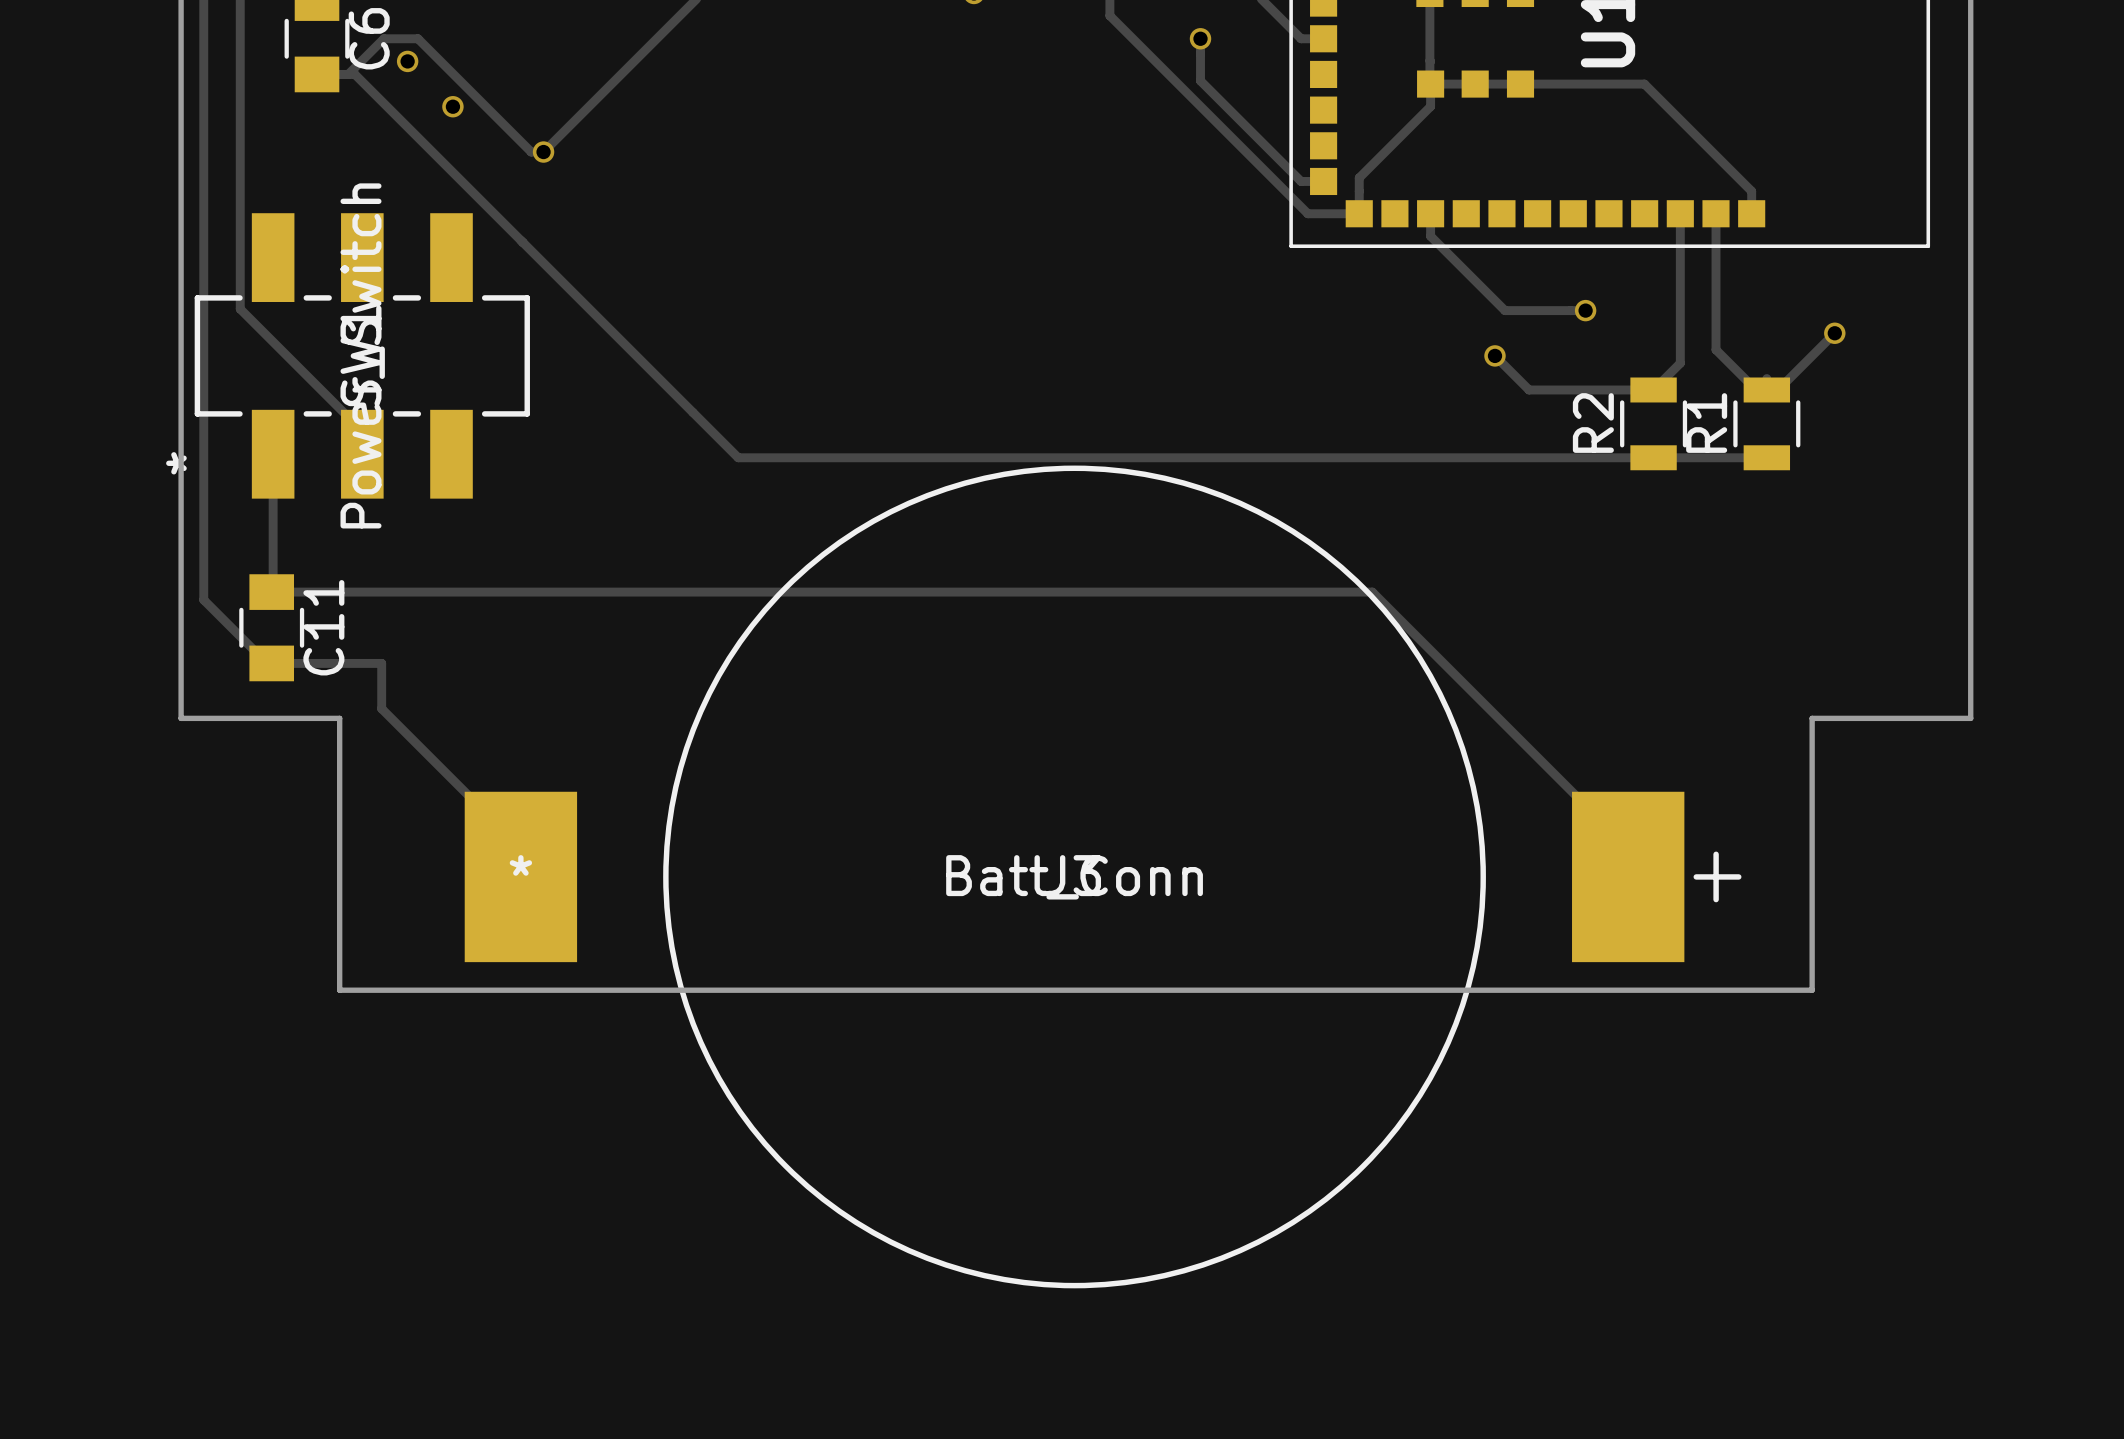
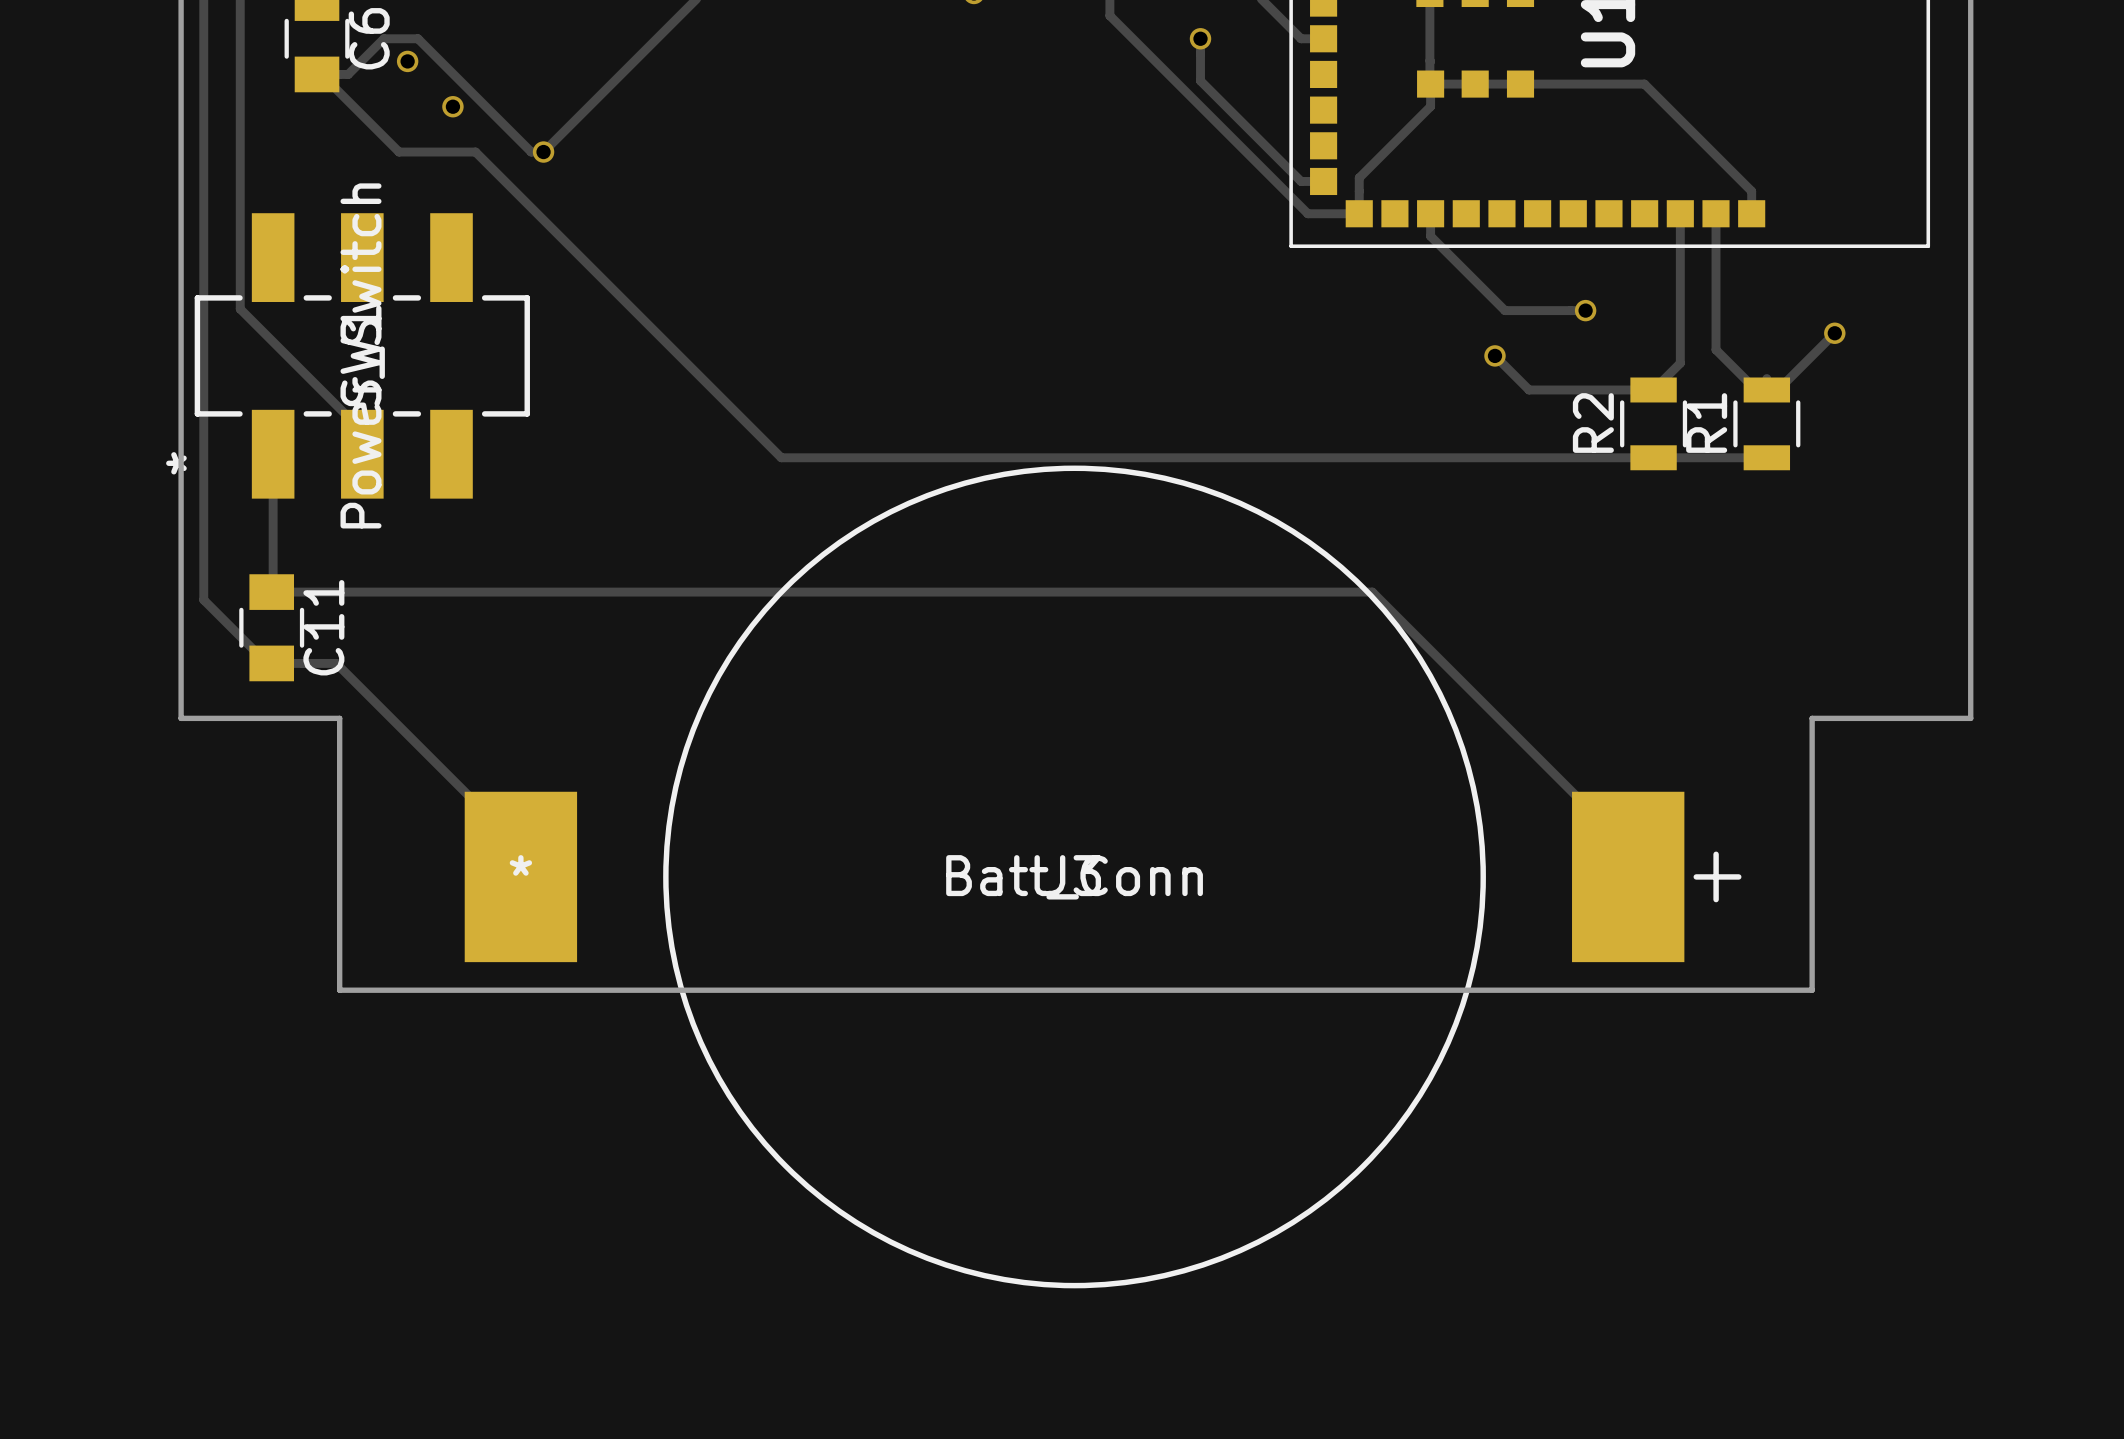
track: (348, 74) (354, 74) (738, 457) (781, 457) -> (321, 74) (399, 152) (475, 152) (781, 457)
track: (336, 663) (381, 663) (381, 708) -> (336, 663) (381, 708)

